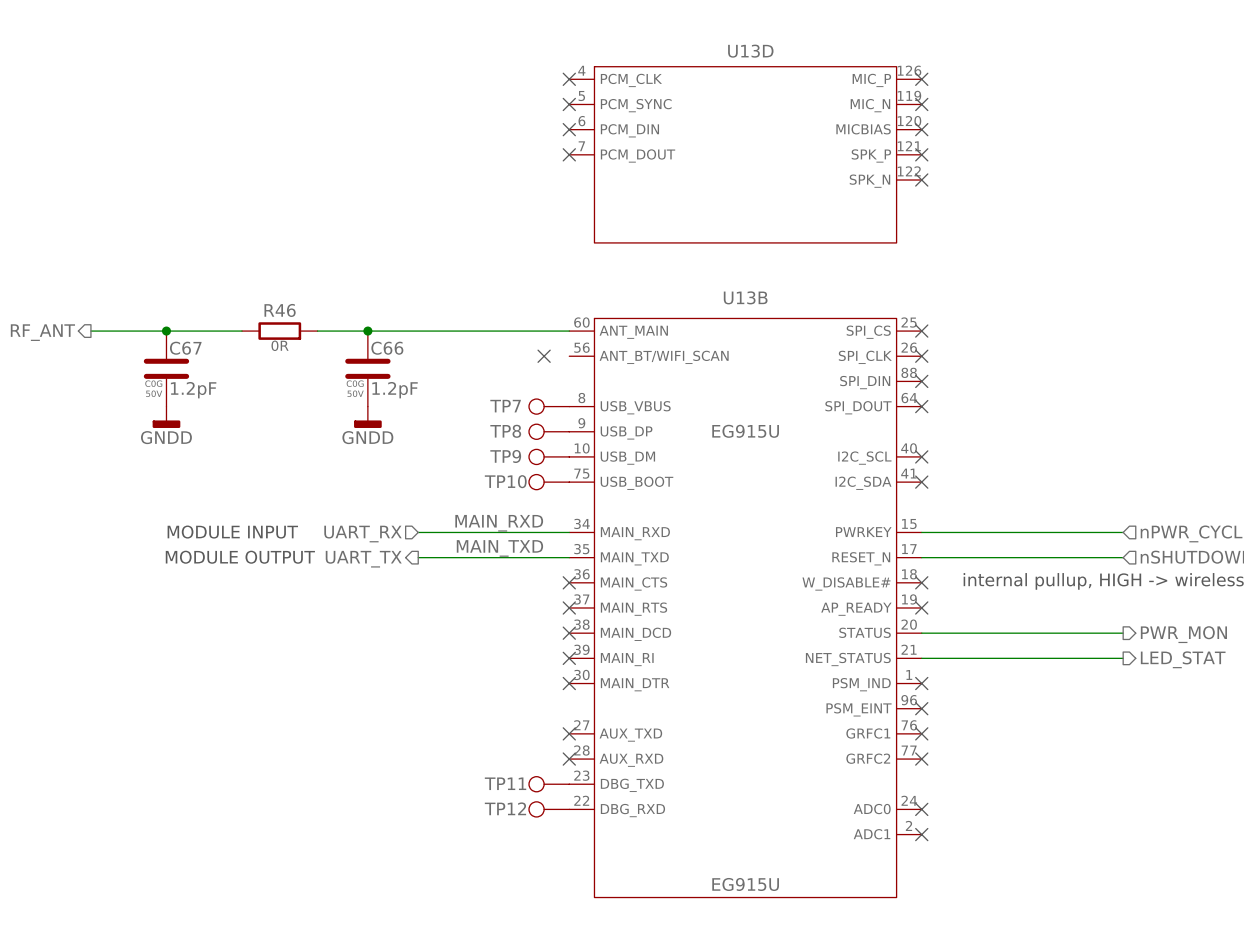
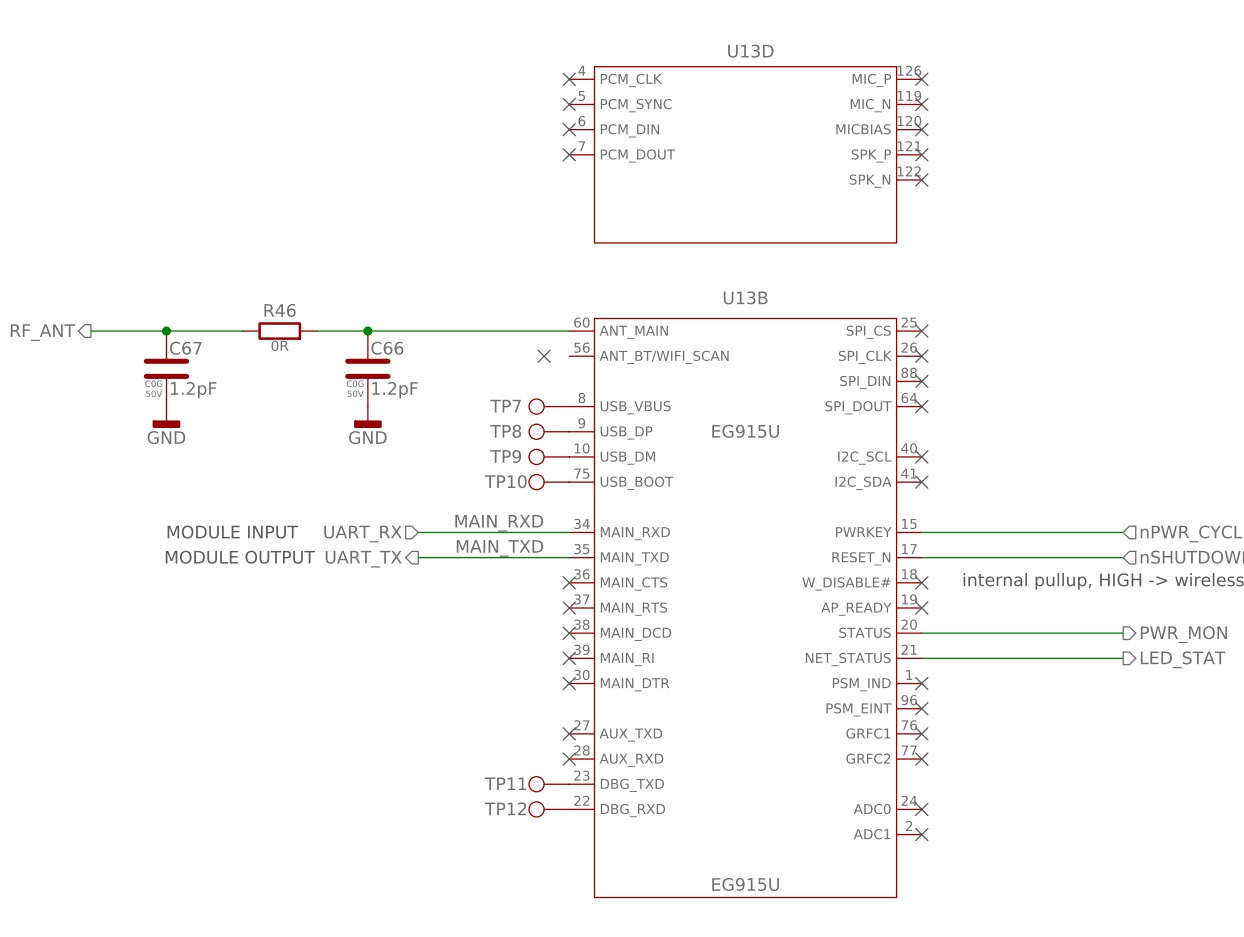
power symbol: GNDD (166, 417) -> GND (166, 417)
power symbol: GNDD (367, 417) -> GND (367, 417)

